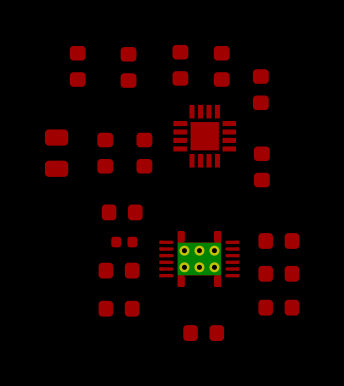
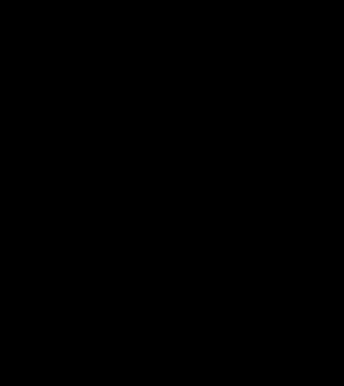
part: (180, 65) -> none
part: (77, 66) -> none
part: (221, 66) -> none
part: (128, 67) -> none
part: (260, 89) -> none
part: (204, 136) -> none
part: (56, 153) -> none
part: (105, 153) -> none
part: (144, 153) -> none
part: (261, 166) -> none
part: (122, 212) -> none
part: (278, 240) -> none
part: (124, 242) -> none
part: (199, 258) -> none
part: (119, 270) -> none
part: (278, 273) -> none
part: (278, 307) -> none
part: (119, 308) -> none
part: (203, 333) -> none

